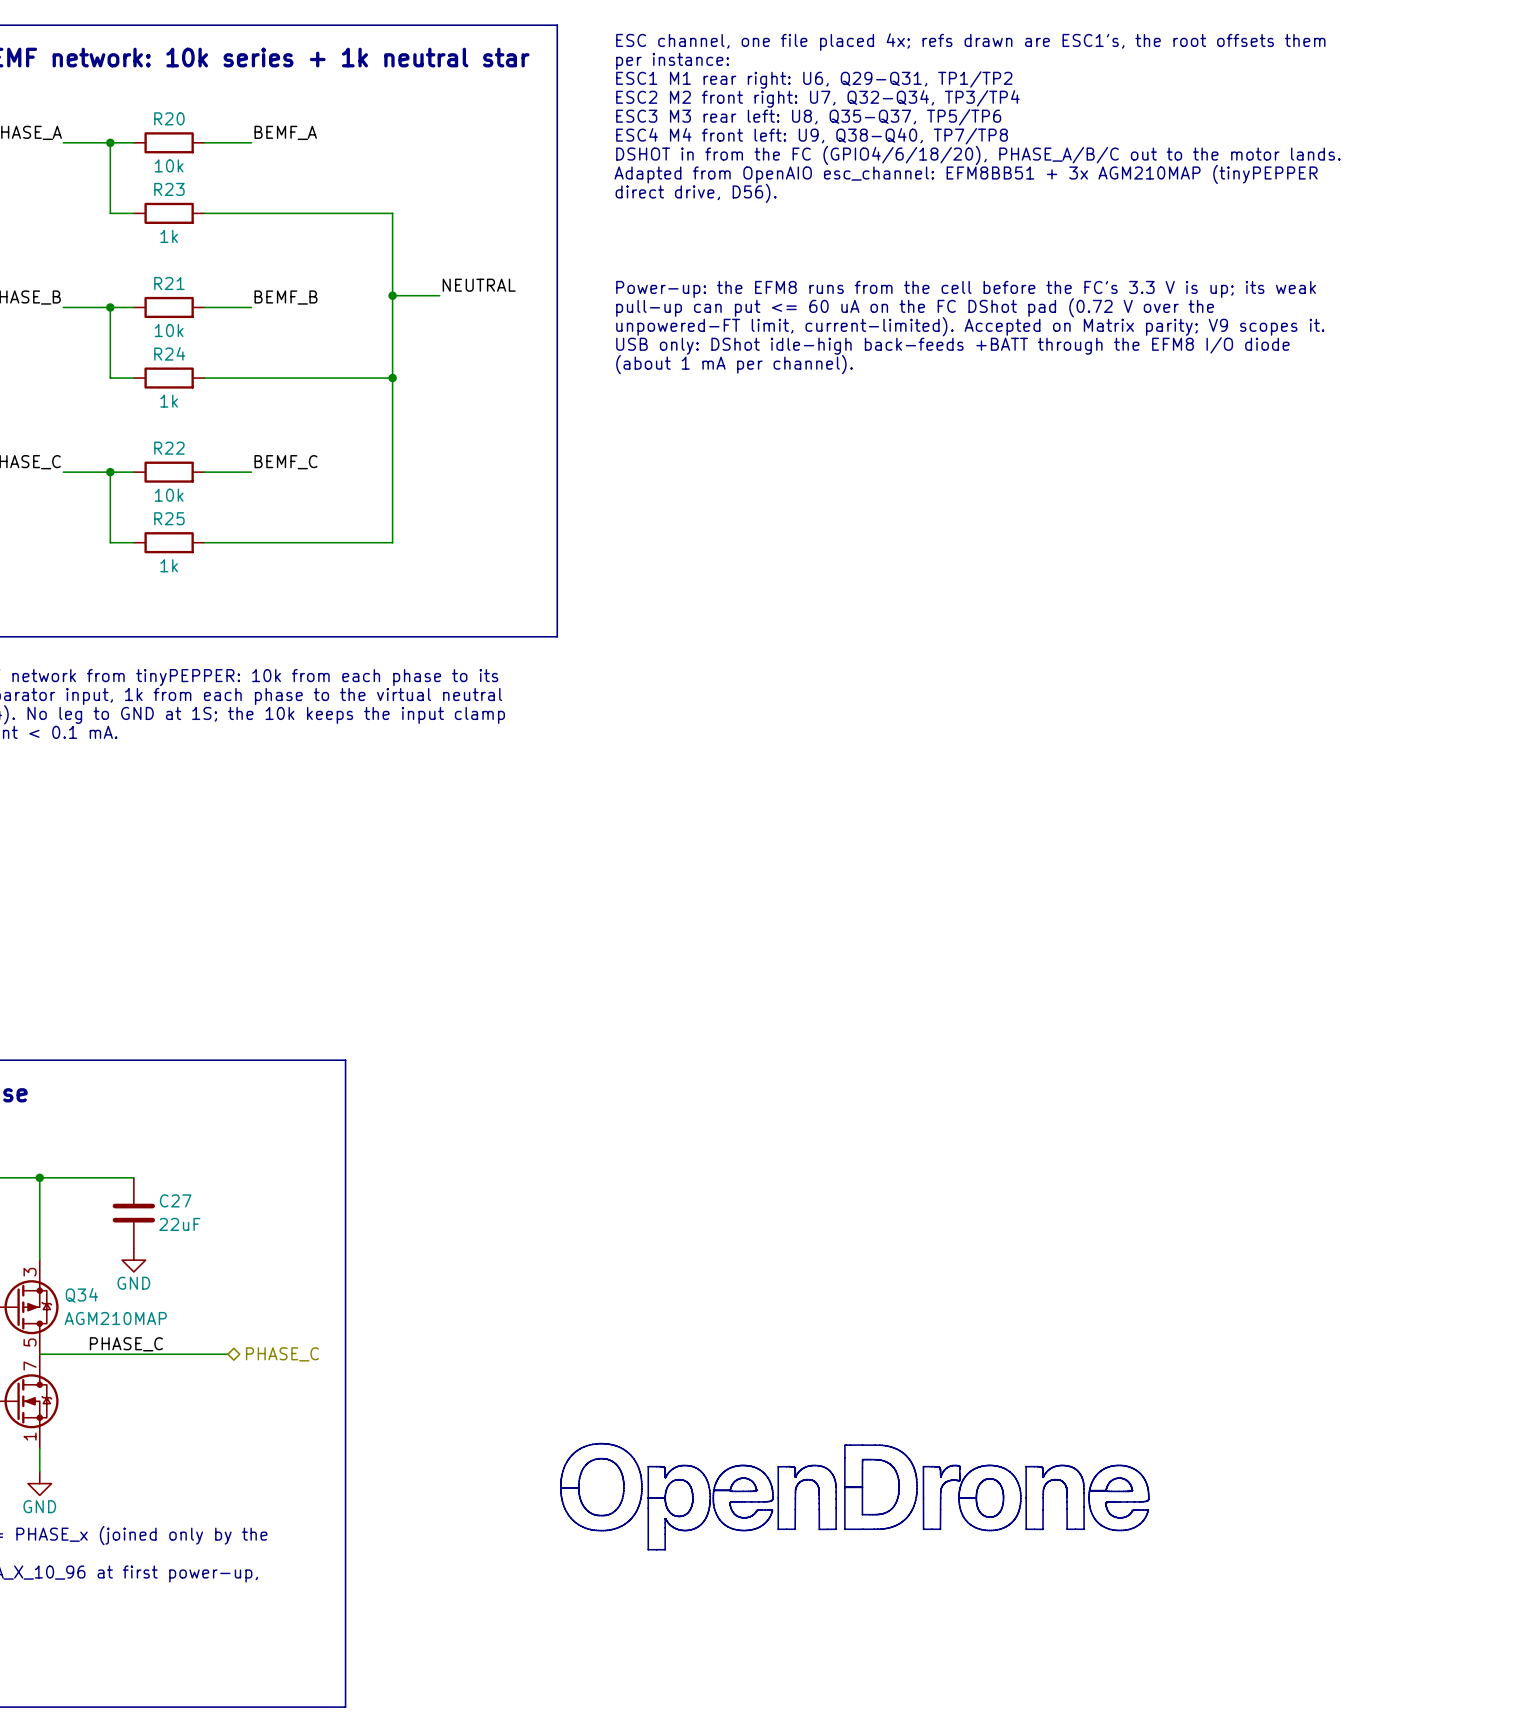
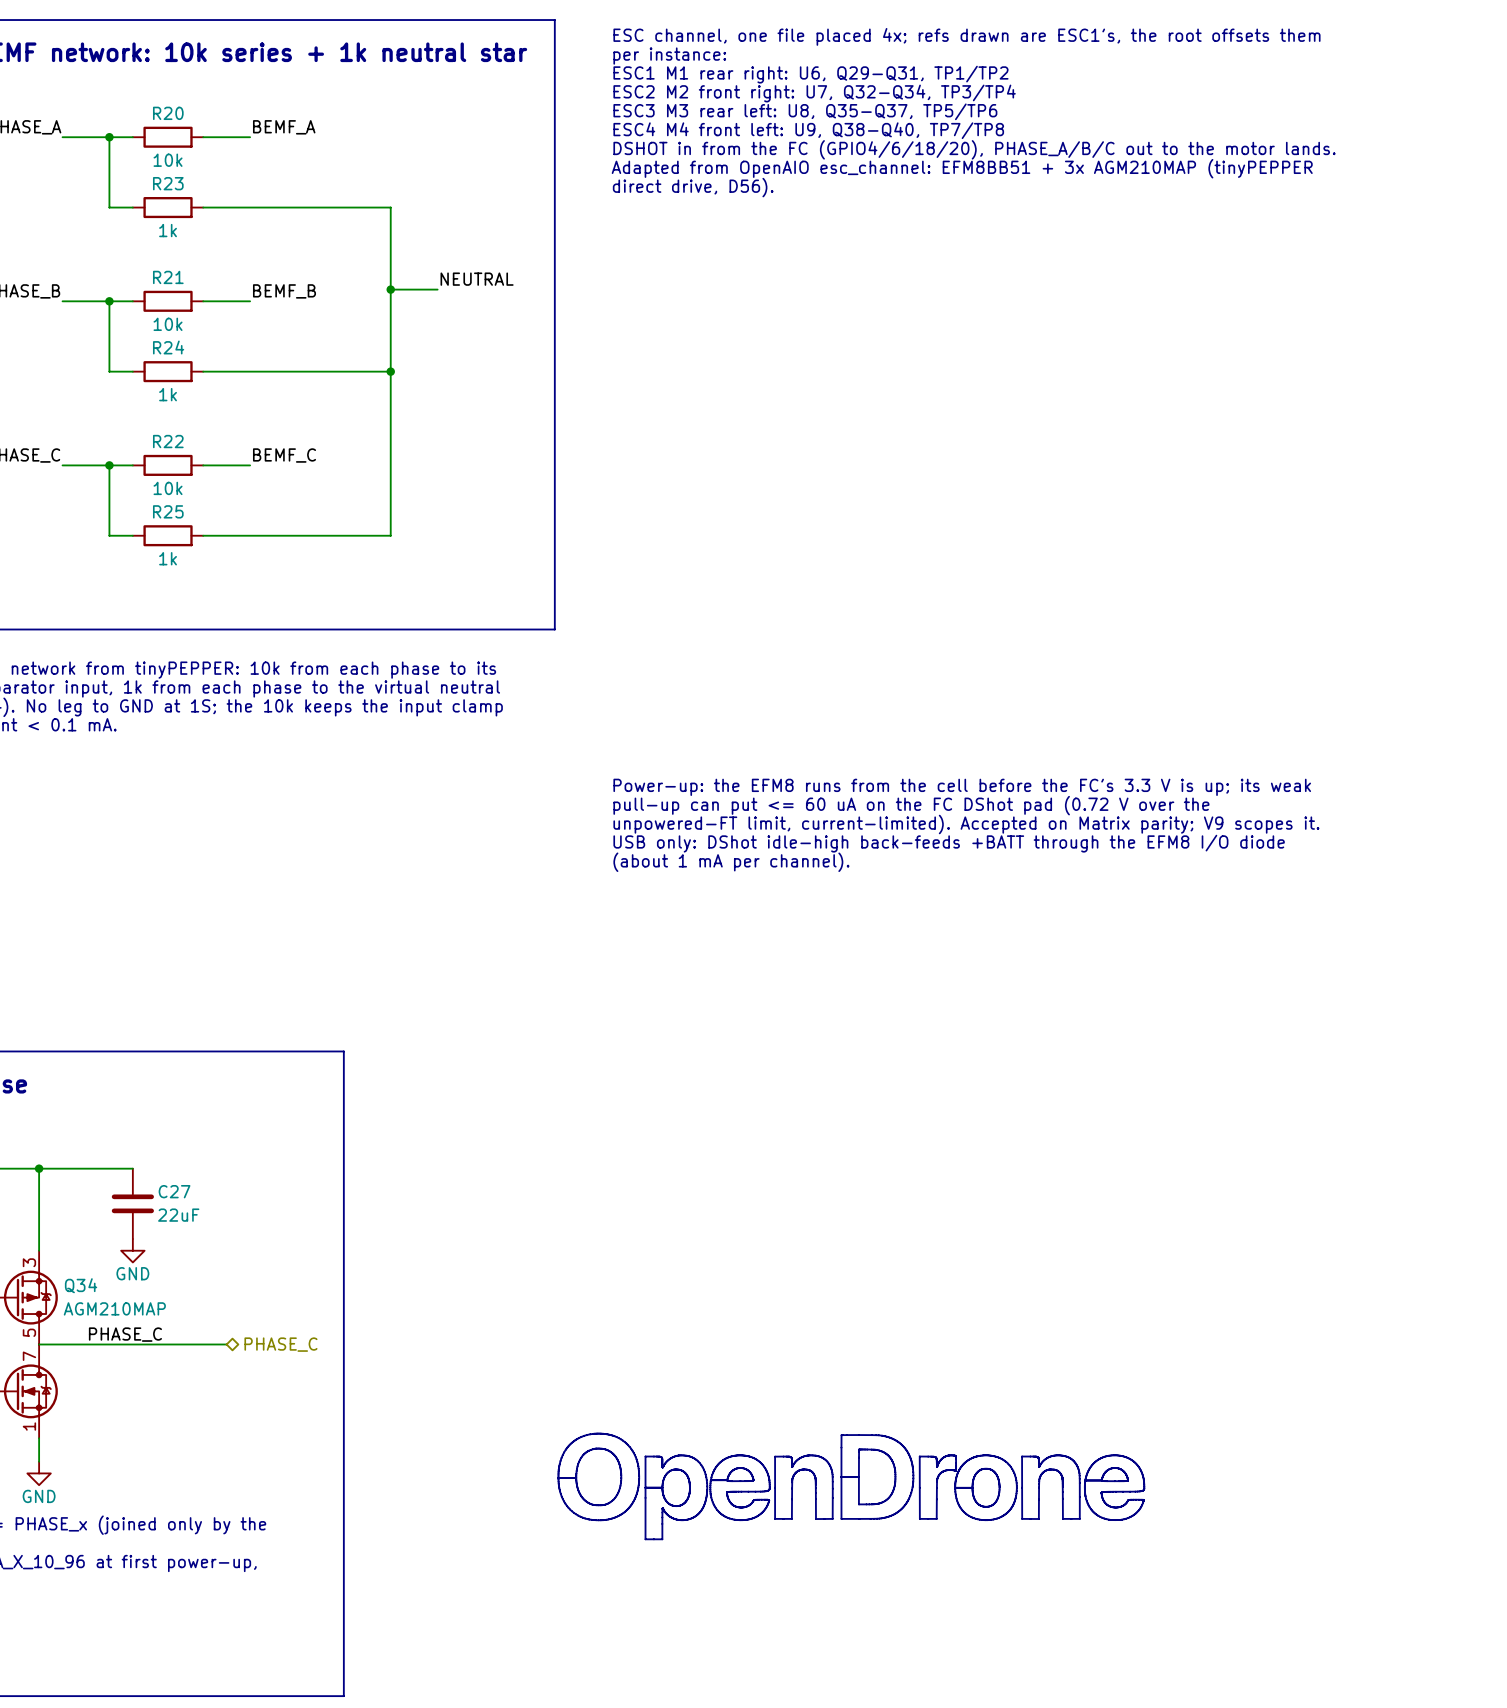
text: Power-up: the EFM8 runs from the cell before the FC's 3.3 V is up; its weak (966, 289) -> none
text: pull-up can put <= 60 uA on the FC DShot pad (0.72 V over the (915, 307) -> none
text: unpowered-FT limit, current-limited). Accepted on Matrix parity; V9 scopes it. (970, 326) -> none
text: USB only: DShot idle-high back-feeds +BATT through the EFM8 I/O diode (952, 345) -> none
text: (about 1 mA per channel). (734, 364) -> none
text: none -> Power-up: the EFM8 runs from the cell before the FC's 3.3 V is up; its weak (962, 787)
text: none -> pull-up can put <= 60 uA on the FC DShot pad (0.72 V over the (911, 805)
text: none -> unpowered-FT limit, current-limited). Accepted on Matrix parity; V9 scopes it. (966, 824)
text: none -> USB only: DShot idle-high back-feeds +BATT through the EFM8 I/O diode (949, 843)
text: none -> (about 1 mA per channel). (731, 862)

